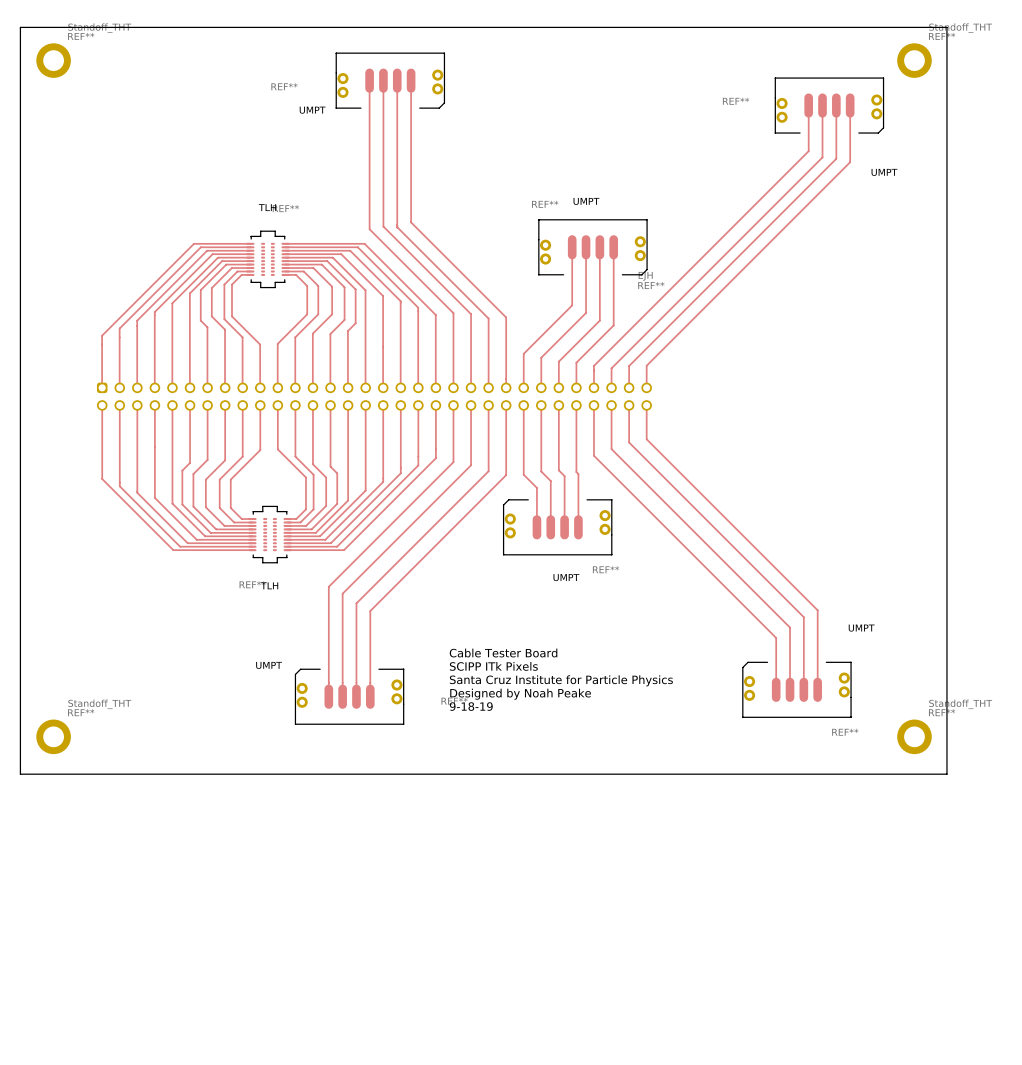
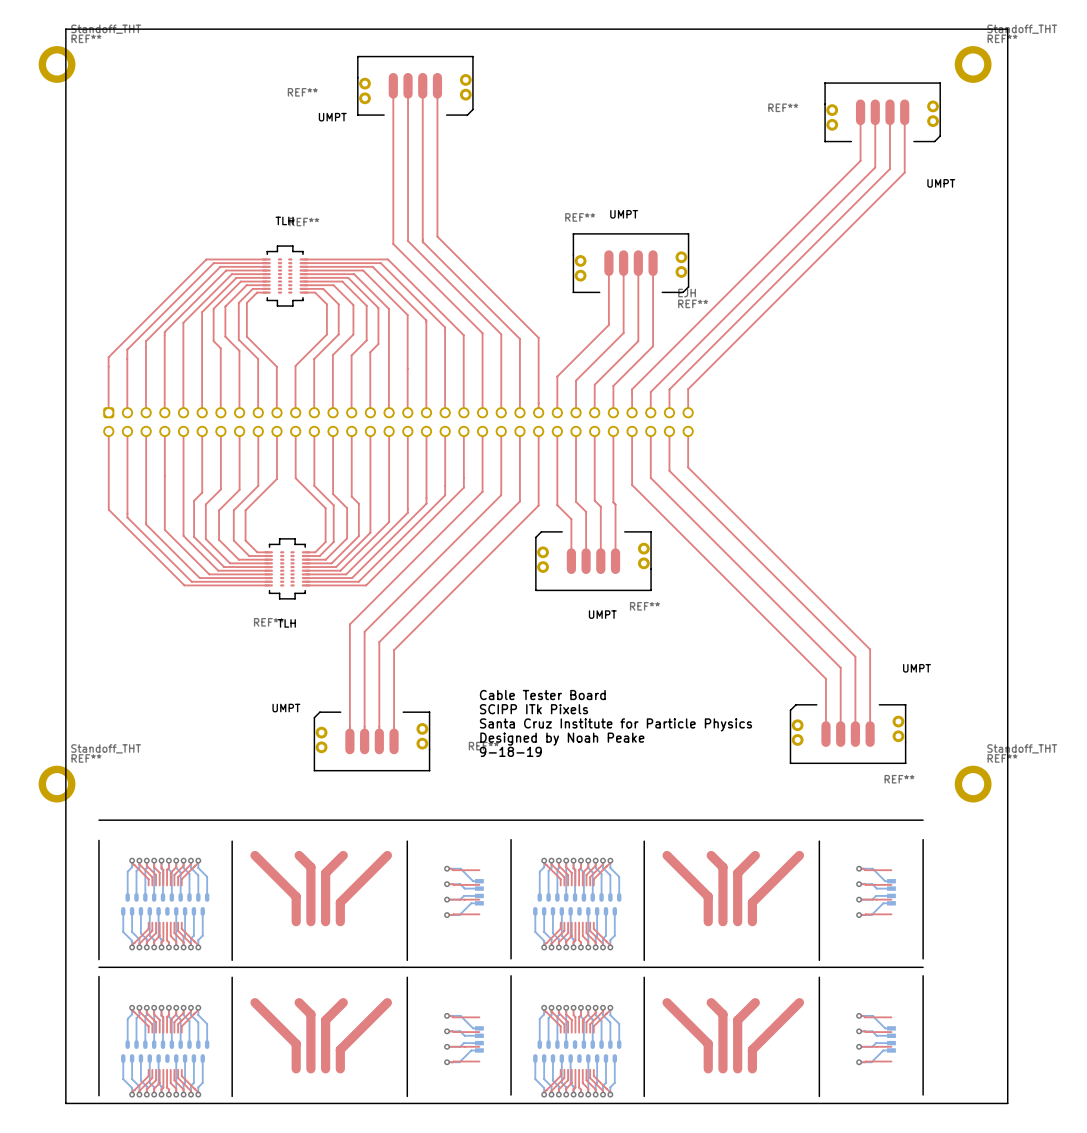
board edge: (61, 27) (20, 27) (20, 774) (946, 774) -> (65, 29) (65, 1103) (1007, 1103) (1007, 823)
line: none -> (98, 820) (923, 820)
line: none -> (98, 840) (98, 959)
line: none -> (511, 839) (511, 958)
line: none -> (923, 839) (923, 958)
line: none -> (232, 841) (232, 960)
line: none -> (407, 841) (407, 960)
line: none -> (644, 841) (644, 960)
line: none -> (819, 841) (819, 960)
top track: none -> (254, 855) (296, 896) (296, 921)
top track: none -> (299, 855) (310, 867) (310, 921)
top track: none -> (343, 855) (325, 873) (325, 921)
top track: none -> (387, 855) (340, 902) (340, 921)
top track: none -> (667, 855) (708, 896) (708, 921)
top track: none -> (711, 855) (722, 867) (722, 921)
top track: none -> (755, 855) (737, 873) (737, 921)
top track: none -> (799, 855) (752, 902) (752, 921)
top track: none -> (132, 860) (148, 879) (148, 885)
bottom track: none -> (132, 860) (132, 867) (127, 871) (127, 897)
via: none -> (132, 860)
top track: none -> (139, 860) (139, 864) (152, 877) (152, 885)
bottom track: none -> (139, 860) (139, 867) (136, 870) (136, 897)
via: none -> (139, 860)
top track: none -> (146, 860) (146, 865) (156, 874) (156, 885)
bottom track: none -> (146, 860) (145, 897)
via: none -> (146, 860)
top track: none -> (154, 860) (154, 867) (159, 872) (159, 885)
bottom track: none -> (154, 860) (154, 897)
via: none -> (154, 860)
top track: none -> (161, 860) (163, 885)
bottom track: none -> (161, 860) (163, 897)
via: none -> (161, 860)
top track: none -> (168, 860) (167, 885)
bottom track: none -> (168, 860) (168, 869) (171, 872) (171, 897)
via: none -> (168, 860)
top track: none -> (176, 860) (176, 867) (170, 872) (170, 885)
bottom track: none -> (176, 860) (176, 867) (180, 872) (180, 897)
via: none -> (176, 860)
top track: none -> (183, 860) (183, 865) (174, 874) (174, 885)
bottom track: none -> (183, 860) (183, 867) (189, 873) (189, 897)
via: none -> (183, 860)
top track: none -> (190, 860) (190, 864) (178, 877) (178, 885)
bottom track: none -> (190, 860) (190, 867) (198, 875) (198, 897)
via: none -> (190, 860)
top track: none -> (198, 860) (181, 879) (181, 885)
bottom track: none -> (198, 860) (198, 867) (207, 876) (207, 897)
via: none -> (198, 860)
top track: none -> (544, 860) (560, 879) (560, 885)
bottom track: none -> (544, 860) (544, 867) (539, 871) (539, 897)
via: none -> (544, 860)
top track: none -> (551, 860) (551, 864) (564, 877) (564, 885)
bottom track: none -> (551, 860) (551, 867) (548, 870) (548, 897)
via: none -> (551, 860)
top track: none -> (558, 860) (558, 865) (568, 874) (568, 885)
bottom track: none -> (558, 860) (557, 897)
via: none -> (558, 860)
top track: none -> (566, 860) (566, 867) (571, 872) (571, 885)
bottom track: none -> (566, 860) (566, 897)
via: none -> (566, 860)
top track: none -> (573, 860) (575, 885)
bottom track: none -> (573, 860) (575, 897)
via: none -> (573, 860)
top track: none -> (580, 860) (579, 885)
bottom track: none -> (580, 860) (580, 869) (583, 872) (583, 897)
via: none -> (580, 860)
top track: none -> (588, 860) (588, 867) (582, 872) (582, 885)
bottom track: none -> (588, 860) (588, 867) (592, 872) (592, 897)
via: none -> (588, 860)
top track: none -> (595, 860) (595, 865) (586, 874) (586, 885)
bottom track: none -> (595, 860) (595, 867) (601, 873) (601, 897)
via: none -> (595, 860)
top track: none -> (603, 860) (603, 864) (590, 877) (590, 885)
bottom track: none -> (603, 860) (603, 867) (610, 875) (610, 897)
via: none -> (603, 860)
top track: none -> (610, 860) (593, 879) (593, 885)
bottom track: none -> (610, 860) (610, 867) (619, 876) (619, 897)
via: none -> (610, 860)
top track: none -> (447, 868) (479, 870)
bottom track: none -> (447, 868) (460, 868) (473, 881) (479, 881)
via: none -> (447, 868)
top track: none -> (859, 868) (891, 870)
bottom track: none -> (859, 868) (872, 868) (885, 881) (891, 881)
via: none -> (859, 868)
top track: none -> (447, 884) (479, 884)
bottom track: none -> (447, 884) (460, 884) (464, 888) (479, 888)
via: none -> (447, 884)
top track: none -> (859, 884) (891, 884)
bottom track: none -> (859, 884) (872, 884) (876, 888) (891, 888)
via: none -> (859, 884)
part: none -> (479, 892)
part: none -> (891, 892)
bottom track: none -> (479, 895) (463, 895) (460, 899) (447, 899)
bottom track: none -> (891, 895) (876, 895) (872, 899) (859, 899)
part: none -> (167, 897)
part: none -> (579, 897)
top track: none -> (447, 899) (479, 899)
via: none -> (447, 899)
top track: none -> (859, 899) (891, 899)
via: none -> (859, 899)
bottom track: none -> (479, 903) (471, 903) (459, 915) (447, 915)
bottom track: none -> (891, 903) (883, 903) (871, 915) (859, 915)
bottom track: none -> (123, 911) (123, 932) (132, 940) (132, 947)
bottom track: none -> (132, 911) (132, 932) (139, 939) (139, 947)
bottom track: none -> (140, 911) (140, 933) (146, 939) (146, 947)
bottom track: none -> (149, 911) (149, 935) (154, 940) (154, 947)
bottom track: none -> (158, 911) (158, 936) (161, 939) (161, 947)
part: none -> (163, 911)
bottom track: none -> (176, 911) (176, 947)
bottom track: none -> (185, 911) (183, 947)
bottom track: none -> (193, 911) (193, 935) (190, 938) (190, 947)
bottom track: none -> (202, 911) (202, 935) (198, 940) (198, 947)
bottom track: none -> (535, 911) (535, 932) (544, 940) (544, 947)
bottom track: none -> (544, 911) (544, 932) (551, 939) (551, 947)
bottom track: none -> (552, 911) (552, 933) (558, 939) (558, 947)
bottom track: none -> (561, 911) (561, 935) (566, 940) (566, 947)
bottom track: none -> (570, 911) (570, 936) (573, 939) (573, 947)
part: none -> (575, 911)
bottom track: none -> (588, 911) (588, 947)
bottom track: none -> (597, 911) (595, 947)
bottom track: none -> (605, 911) (605, 935) (603, 938) (603, 947)
bottom track: none -> (614, 911) (614, 935) (610, 940) (610, 947)
via: none -> (447, 915)
top track: none -> (479, 914) (447, 915)
via: none -> (859, 915)
top track: none -> (891, 914) (859, 915)
top track: none -> (148, 922) (148, 928) (132, 947)
top track: none -> (152, 922) (152, 930) (139, 943) (139, 947)
top track: none -> (156, 922) (156, 933) (146, 942) (146, 947)
top track: none -> (159, 922) (159, 936) (154, 941) (154, 947)
top track: none -> (163, 922) (161, 947)
top track: none -> (167, 922) (168, 947)
top track: none -> (170, 922) (170, 936) (176, 941) (176, 947)
top track: none -> (174, 922) (174, 933) (183, 942) (183, 947)
top track: none -> (178, 922) (178, 930) (190, 943) (190, 947)
top track: none -> (181, 922) (181, 928) (198, 947)
top track: none -> (560, 922) (560, 928) (544, 947)
top track: none -> (564, 922) (564, 930) (551, 943) (551, 947)
top track: none -> (568, 922) (568, 933) (558, 942) (558, 947)
top track: none -> (571, 922) (571, 936) (566, 941) (566, 947)
top track: none -> (575, 922) (573, 947)
top track: none -> (579, 922) (580, 947)
top track: none -> (582, 922) (582, 936) (588, 941) (588, 947)
top track: none -> (586, 922) (586, 933) (595, 942) (595, 947)
top track: none -> (590, 922) (590, 930) (603, 943) (603, 947)
top track: none -> (593, 922) (593, 928) (610, 947)
via: none -> (132, 947)
via: none -> (139, 947)
via: none -> (146, 947)
via: none -> (154, 947)
via: none -> (161, 947)
via: none -> (168, 947)
via: none -> (176, 947)
via: none -> (183, 947)
via: none -> (190, 947)
via: none -> (198, 947)
via: none -> (544, 947)
via: none -> (551, 947)
via: none -> (558, 947)
via: none -> (566, 947)
via: none -> (573, 947)
via: none -> (580, 947)
via: none -> (588, 947)
via: none -> (595, 947)
via: none -> (603, 947)
via: none -> (610, 947)
line: none -> (98, 967) (923, 967)
line: none -> (511, 975) (511, 1094)
line: none -> (923, 975) (923, 1094)
line: none -> (98, 976) (98, 1095)
line: none -> (232, 977) (232, 1096)
line: none -> (407, 977) (407, 1096)
line: none -> (644, 977) (644, 1096)
line: none -> (819, 977) (819, 1096)
top track: none -> (254, 1002) (296, 1043) (296, 1068)
top track: none -> (299, 1002) (310, 1014) (310, 1068)
top track: none -> (343, 1002) (325, 1020) (325, 1068)
top track: none -> (387, 1002) (340, 1049) (340, 1068)
top track: none -> (667, 1002) (708, 1043) (708, 1068)
top track: none -> (711, 1002) (722, 1014) (722, 1068)
top track: none -> (755, 1002) (737, 1020) (737, 1068)
top track: none -> (799, 1002) (752, 1049) (752, 1068)
top track: none -> (132, 1007) (148, 1026) (148, 1032)
bottom track: none -> (132, 1007) (132, 1014) (127, 1018) (127, 1044)
via: none -> (132, 1007)
top track: none -> (139, 1007) (139, 1011) (152, 1024) (152, 1032)
bottom track: none -> (139, 1007) (139, 1015) (136, 1018) (136, 1044)
via: none -> (139, 1007)
top track: none -> (146, 1007) (146, 1012) (156, 1022) (156, 1032)
bottom track: none -> (146, 1007) (145, 1044)
via: none -> (146, 1007)
top track: none -> (154, 1007) (154, 1014) (159, 1019) (159, 1032)
bottom track: none -> (154, 1007) (154, 1044)
via: none -> (154, 1007)
top track: none -> (161, 1007) (163, 1032)
bottom track: none -> (161, 1007) (163, 1044)
via: none -> (161, 1007)
top track: none -> (168, 1007) (167, 1032)
bottom track: none -> (168, 1007) (168, 1016) (171, 1019) (171, 1044)
via: none -> (168, 1007)
top track: none -> (176, 1007) (176, 1014) (170, 1019) (170, 1032)
bottom track: none -> (176, 1007) (176, 1015) (180, 1019) (180, 1044)
via: none -> (176, 1007)
top track: none -> (183, 1007) (183, 1012) (174, 1022) (174, 1032)
bottom track: none -> (183, 1007) (183, 1015) (189, 1021) (189, 1044)
via: none -> (183, 1007)
top track: none -> (190, 1007) (190, 1011) (178, 1024) (178, 1032)
bottom track: none -> (190, 1007) (190, 1015) (198, 1022) (198, 1044)
via: none -> (190, 1007)
top track: none -> (198, 1007) (181, 1026) (181, 1032)
bottom track: none -> (198, 1007) (198, 1015) (207, 1023) (207, 1044)
via: none -> (198, 1007)
top track: none -> (544, 1007) (560, 1026) (560, 1032)
bottom track: none -> (544, 1007) (544, 1014) (539, 1018) (539, 1044)
via: none -> (544, 1007)
top track: none -> (551, 1007) (551, 1011) (564, 1024) (564, 1032)
bottom track: none -> (551, 1007) (551, 1015) (548, 1018) (548, 1044)
via: none -> (551, 1007)
top track: none -> (558, 1007) (558, 1012) (568, 1022) (568, 1032)
bottom track: none -> (558, 1007) (557, 1044)
via: none -> (558, 1007)
top track: none -> (566, 1007) (566, 1014) (571, 1019) (571, 1032)
bottom track: none -> (566, 1007) (566, 1044)
via: none -> (566, 1007)
top track: none -> (573, 1007) (575, 1032)
via: none -> (573, 1007)
top track: none -> (580, 1007) (579, 1032)
bottom track: none -> (580, 1007) (580, 1016) (583, 1019) (583, 1044)
via: none -> (580, 1007)
top track: none -> (588, 1007) (588, 1014) (582, 1019) (582, 1032)
bottom track: none -> (588, 1007) (588, 1015) (592, 1019) (592, 1044)
via: none -> (588, 1007)
top track: none -> (595, 1007) (595, 1012) (586, 1022) (586, 1032)
bottom track: none -> (595, 1007) (595, 1015) (601, 1021) (601, 1044)
via: none -> (595, 1007)
top track: none -> (603, 1007) (603, 1011) (590, 1024) (590, 1032)
bottom track: none -> (603, 1007) (603, 1015) (610, 1022) (610, 1044)
via: none -> (603, 1007)
top track: none -> (610, 1007) (593, 1026) (593, 1032)
bottom track: none -> (610, 1007) (610, 1015) (619, 1023) (619, 1044)
via: none -> (610, 1007)
top track: none -> (447, 1015) (479, 1017)
bottom track: none -> (447, 1015) (460, 1015) (473, 1028) (479, 1028)
via: none -> (447, 1015)
top track: none -> (859, 1015) (891, 1017)
bottom track: none -> (859, 1015) (872, 1015) (885, 1028) (891, 1028)
via: none -> (859, 1015)
top track: none -> (447, 1031) (479, 1032)
bottom track: none -> (447, 1031) (460, 1031) (464, 1035) (479, 1035)
via: none -> (447, 1031)
top track: none -> (859, 1031) (891, 1032)
bottom track: none -> (859, 1031) (872, 1031) (876, 1035) (891, 1035)
via: none -> (859, 1031)
part: none -> (479, 1039)
part: none -> (891, 1039)
bottom track: none -> (479, 1043) (463, 1043) (460, 1046) (447, 1046)
bottom track: none -> (891, 1043) (876, 1043) (872, 1046) (859, 1046)
part: none -> (167, 1044)
part: none -> (579, 1044)
top track: none -> (447, 1046) (479, 1046)
via: none -> (447, 1046)
top track: none -> (859, 1046) (891, 1046)
via: none -> (859, 1046)
bottom track: none -> (479, 1050) (471, 1050) (459, 1062) (447, 1062)
bottom track: none -> (891, 1050) (883, 1050) (871, 1062) (859, 1062)
bottom track: none -> (123, 1058) (123, 1079) (132, 1088) (132, 1094)
bottom track: none -> (132, 1058) (132, 1079) (139, 1086) (139, 1094)
bottom track: none -> (140, 1058) (140, 1080) (146, 1086) (146, 1094)
bottom track: none -> (149, 1058) (149, 1082) (154, 1087) (154, 1094)
bottom track: none -> (158, 1058) (158, 1083) (161, 1086) (161, 1094)
part: none -> (163, 1058)
bottom track: none -> (176, 1058) (176, 1094)
bottom track: none -> (185, 1058) (183, 1094)
bottom track: none -> (193, 1058) (193, 1082) (190, 1085) (190, 1094)
bottom track: none -> (202, 1058) (202, 1082) (198, 1087) (198, 1094)
bottom track: none -> (535, 1058) (535, 1079) (544, 1088) (544, 1094)
bottom track: none -> (544, 1058) (544, 1079) (551, 1086) (551, 1094)
bottom track: none -> (552, 1058) (552, 1080) (558, 1086) (558, 1094)
bottom track: none -> (561, 1058) (561, 1082) (566, 1087) (566, 1094)
bottom track: none -> (570, 1058) (570, 1083) (573, 1086) (573, 1094)
part: none -> (575, 1058)
bottom track: none -> (588, 1058) (588, 1094)
bottom track: none -> (597, 1058) (595, 1094)
bottom track: none -> (605, 1058) (605, 1082) (603, 1085) (603, 1094)
bottom track: none -> (614, 1058) (614, 1082) (610, 1087) (610, 1094)
top track: none -> (479, 1061) (447, 1062)
top track: none -> (891, 1061) (859, 1062)
via: none -> (447, 1062)
via: none -> (859, 1062)
top track: none -> (148, 1069) (148, 1076) (132, 1094)
top track: none -> (152, 1069) (152, 1078) (139, 1090) (139, 1094)
top track: none -> (156, 1069) (156, 1080) (146, 1089) (146, 1094)
top track: none -> (159, 1069) (159, 1083) (154, 1088) (154, 1094)
top track: none -> (163, 1069) (161, 1094)
top track: none -> (167, 1069) (168, 1094)
top track: none -> (170, 1069) (170, 1083) (176, 1088) (176, 1094)
top track: none -> (174, 1069) (174, 1080) (183, 1089) (183, 1094)
top track: none -> (178, 1069) (178, 1078) (190, 1090) (190, 1094)
top track: none -> (181, 1069) (181, 1076) (198, 1094)
top track: none -> (560, 1069) (560, 1076) (544, 1094)
top track: none -> (564, 1069) (564, 1078) (551, 1090) (551, 1094)
top track: none -> (568, 1069) (568, 1080) (558, 1089) (558, 1094)
top track: none -> (571, 1069) (571, 1083) (566, 1088) (566, 1094)
top track: none -> (575, 1069) (573, 1094)
top track: none -> (579, 1069) (580, 1094)
top track: none -> (582, 1069) (582, 1083) (588, 1088) (588, 1094)
top track: none -> (586, 1069) (586, 1080) (595, 1089) (595, 1094)
top track: none -> (590, 1069) (590, 1078) (603, 1090) (603, 1094)
top track: none -> (593, 1069) (593, 1076) (610, 1094)
via: none -> (132, 1094)
via: none -> (139, 1094)
via: none -> (146, 1094)
via: none -> (154, 1094)
via: none -> (161, 1094)
via: none -> (168, 1094)
via: none -> (176, 1094)
via: none -> (183, 1094)
via: none -> (190, 1094)
via: none -> (198, 1094)
via: none -> (544, 1094)
via: none -> (551, 1094)
via: none -> (558, 1094)
via: none -> (566, 1094)
via: none -> (573, 1094)
via: none -> (580, 1094)
via: none -> (588, 1094)
via: none -> (595, 1094)
via: none -> (603, 1094)
via: none -> (610, 1094)

